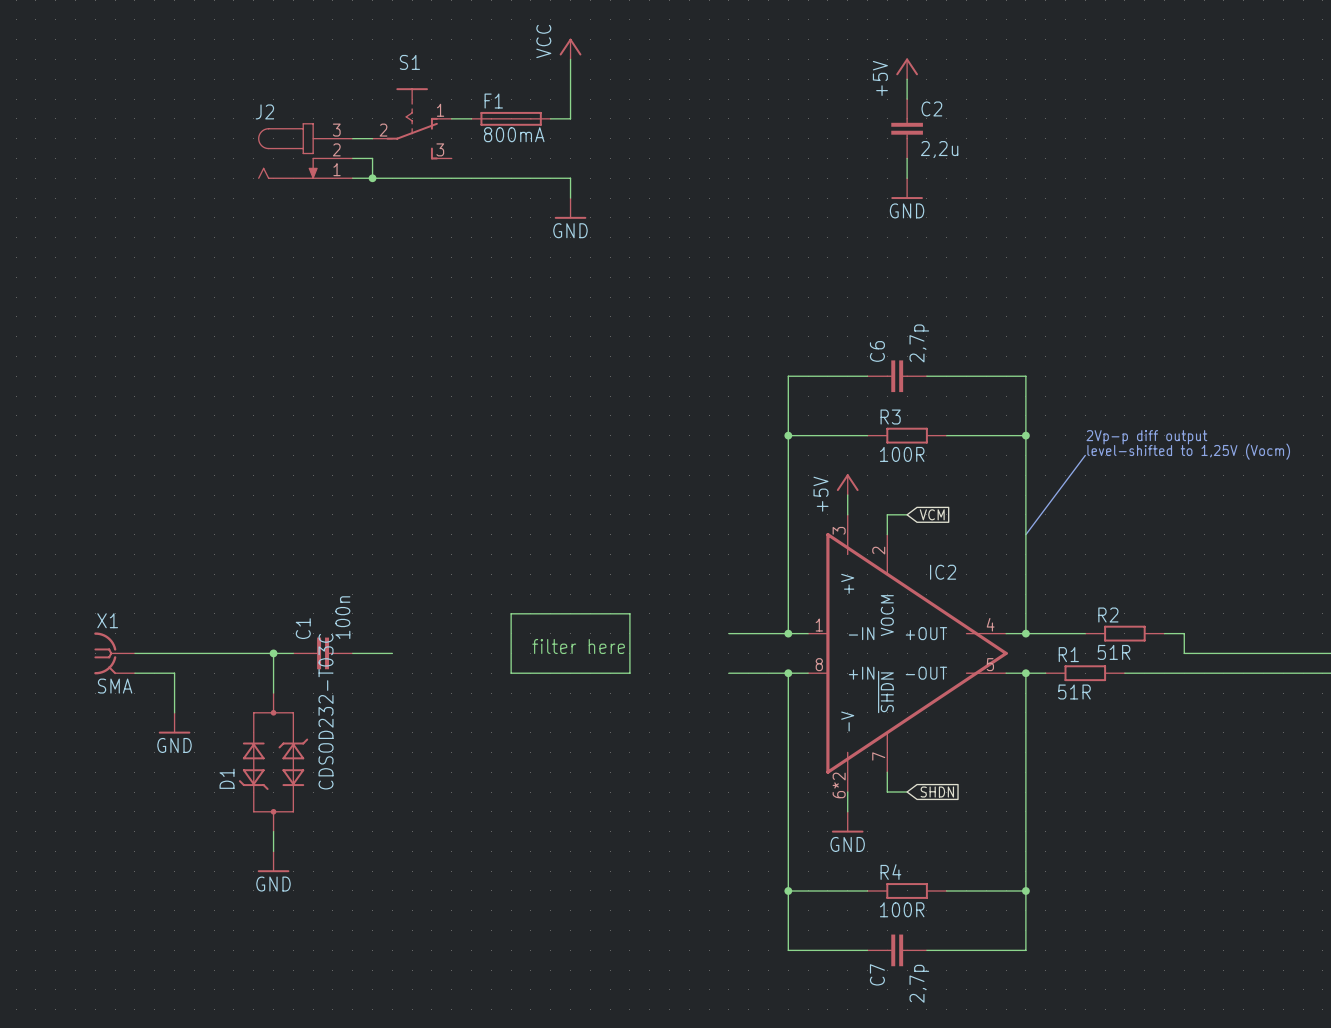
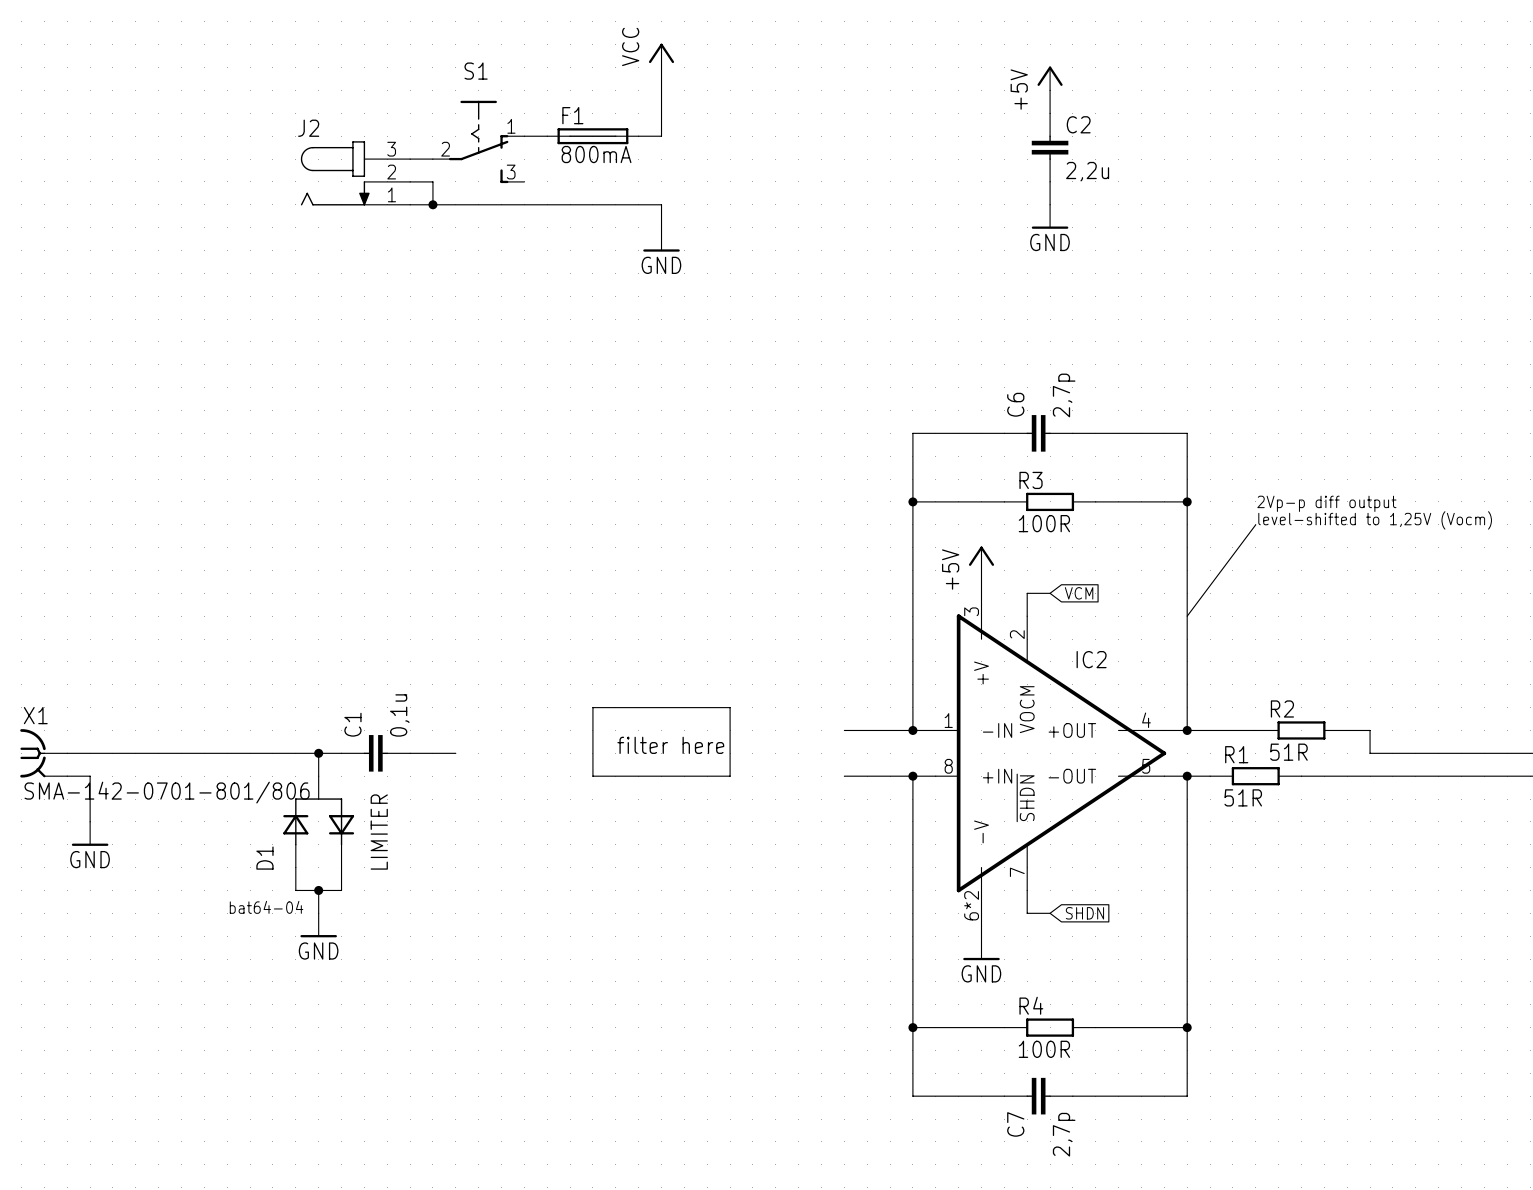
C1 value: 100n (342, 617) -> 0,1u (399, 715)
wire: none -> (67, 753) (158, 753)
X1 position: (114, 653) -> (43, 753)
wire: none -> (67, 776) (90, 776) (90, 821)
wire: (134, 673) (174, 673) (174, 712) -> none
X1 value: SMA (115, 686) -> SMA-142-0701-801/806 (167, 792)
D1 symbol: [238, 693, 309, 832] -> [283, 776, 355, 868]
D1 value: CDSOD232-T03C (326, 711) -> LIMITER (379, 832)
power symbol: none -> GND (90, 833)
power symbol: GND (174, 723) -> none
junction: none -> (318, 890)
text: none -> bat64-04 (266, 907)
wire: (273, 831) (273, 851) -> (318, 890) (318, 913)
power symbol position: GND (273, 861) -> GND (318, 925)

